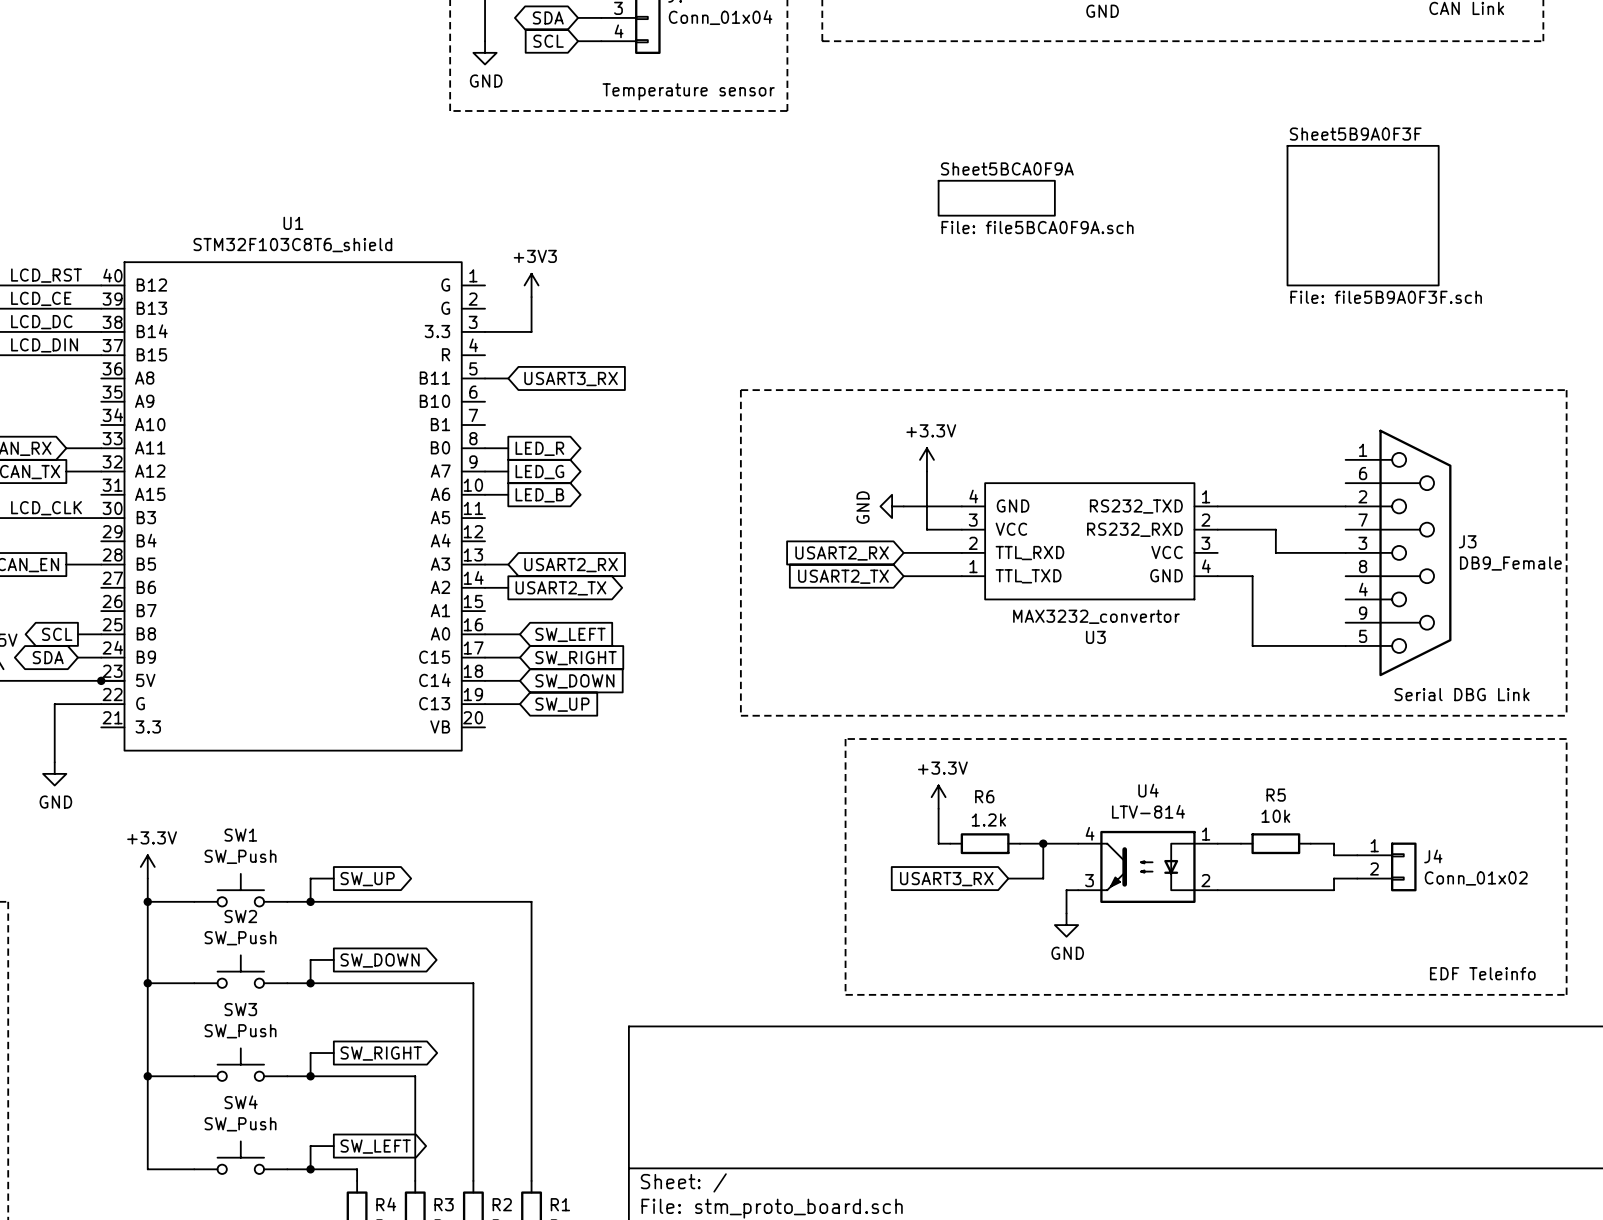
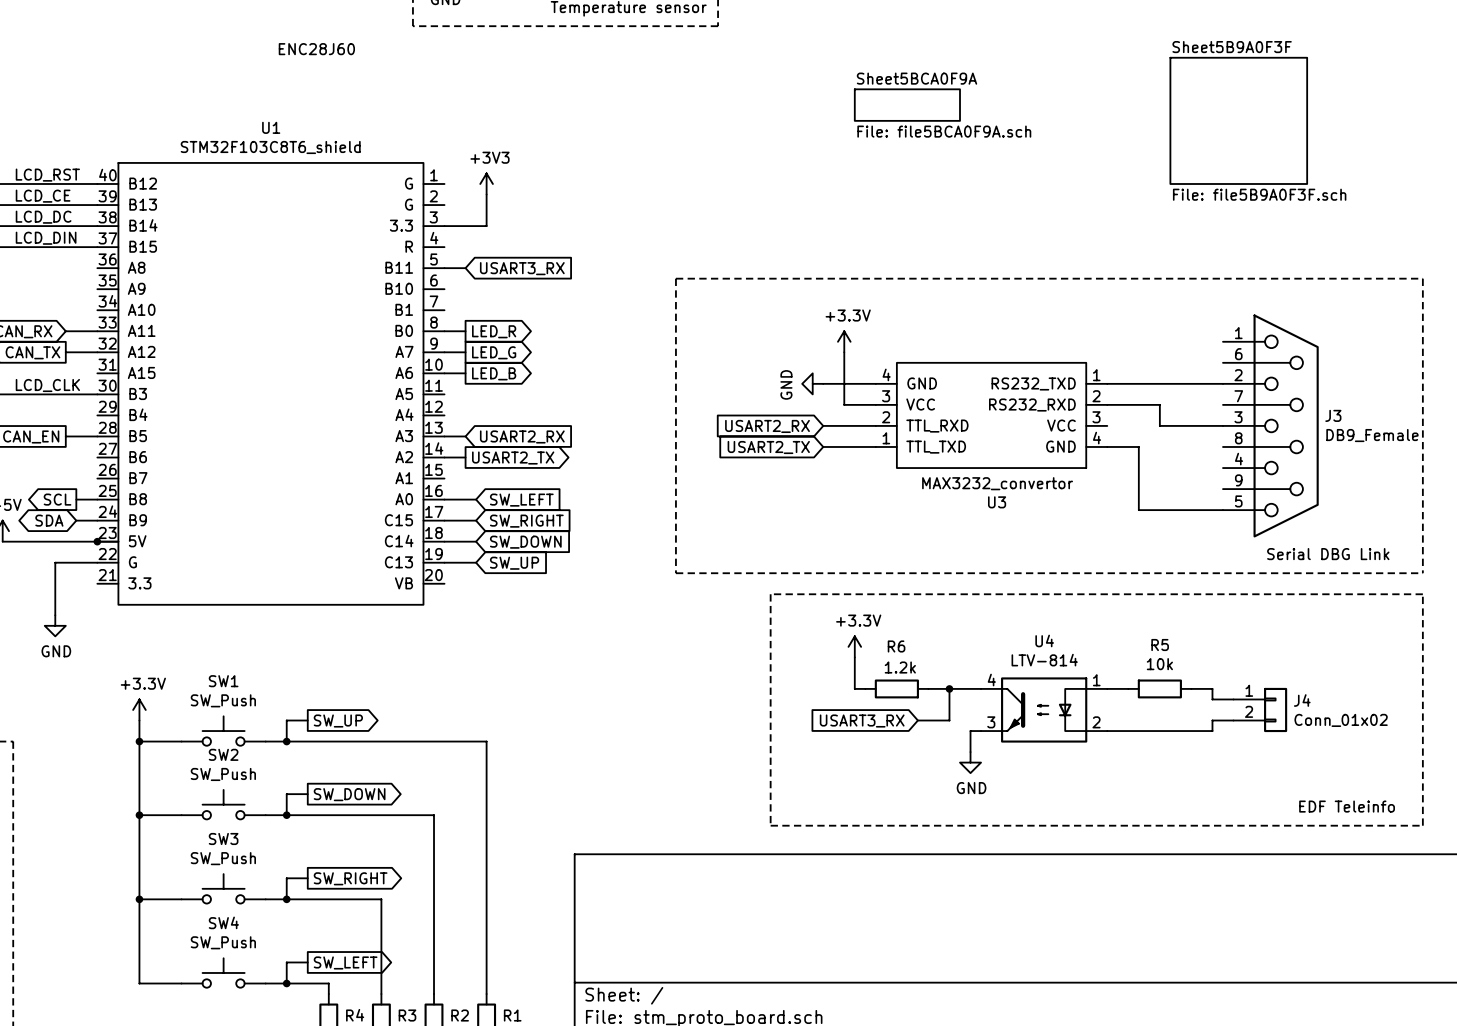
text: none -> ENC28J60 (316, 49)

